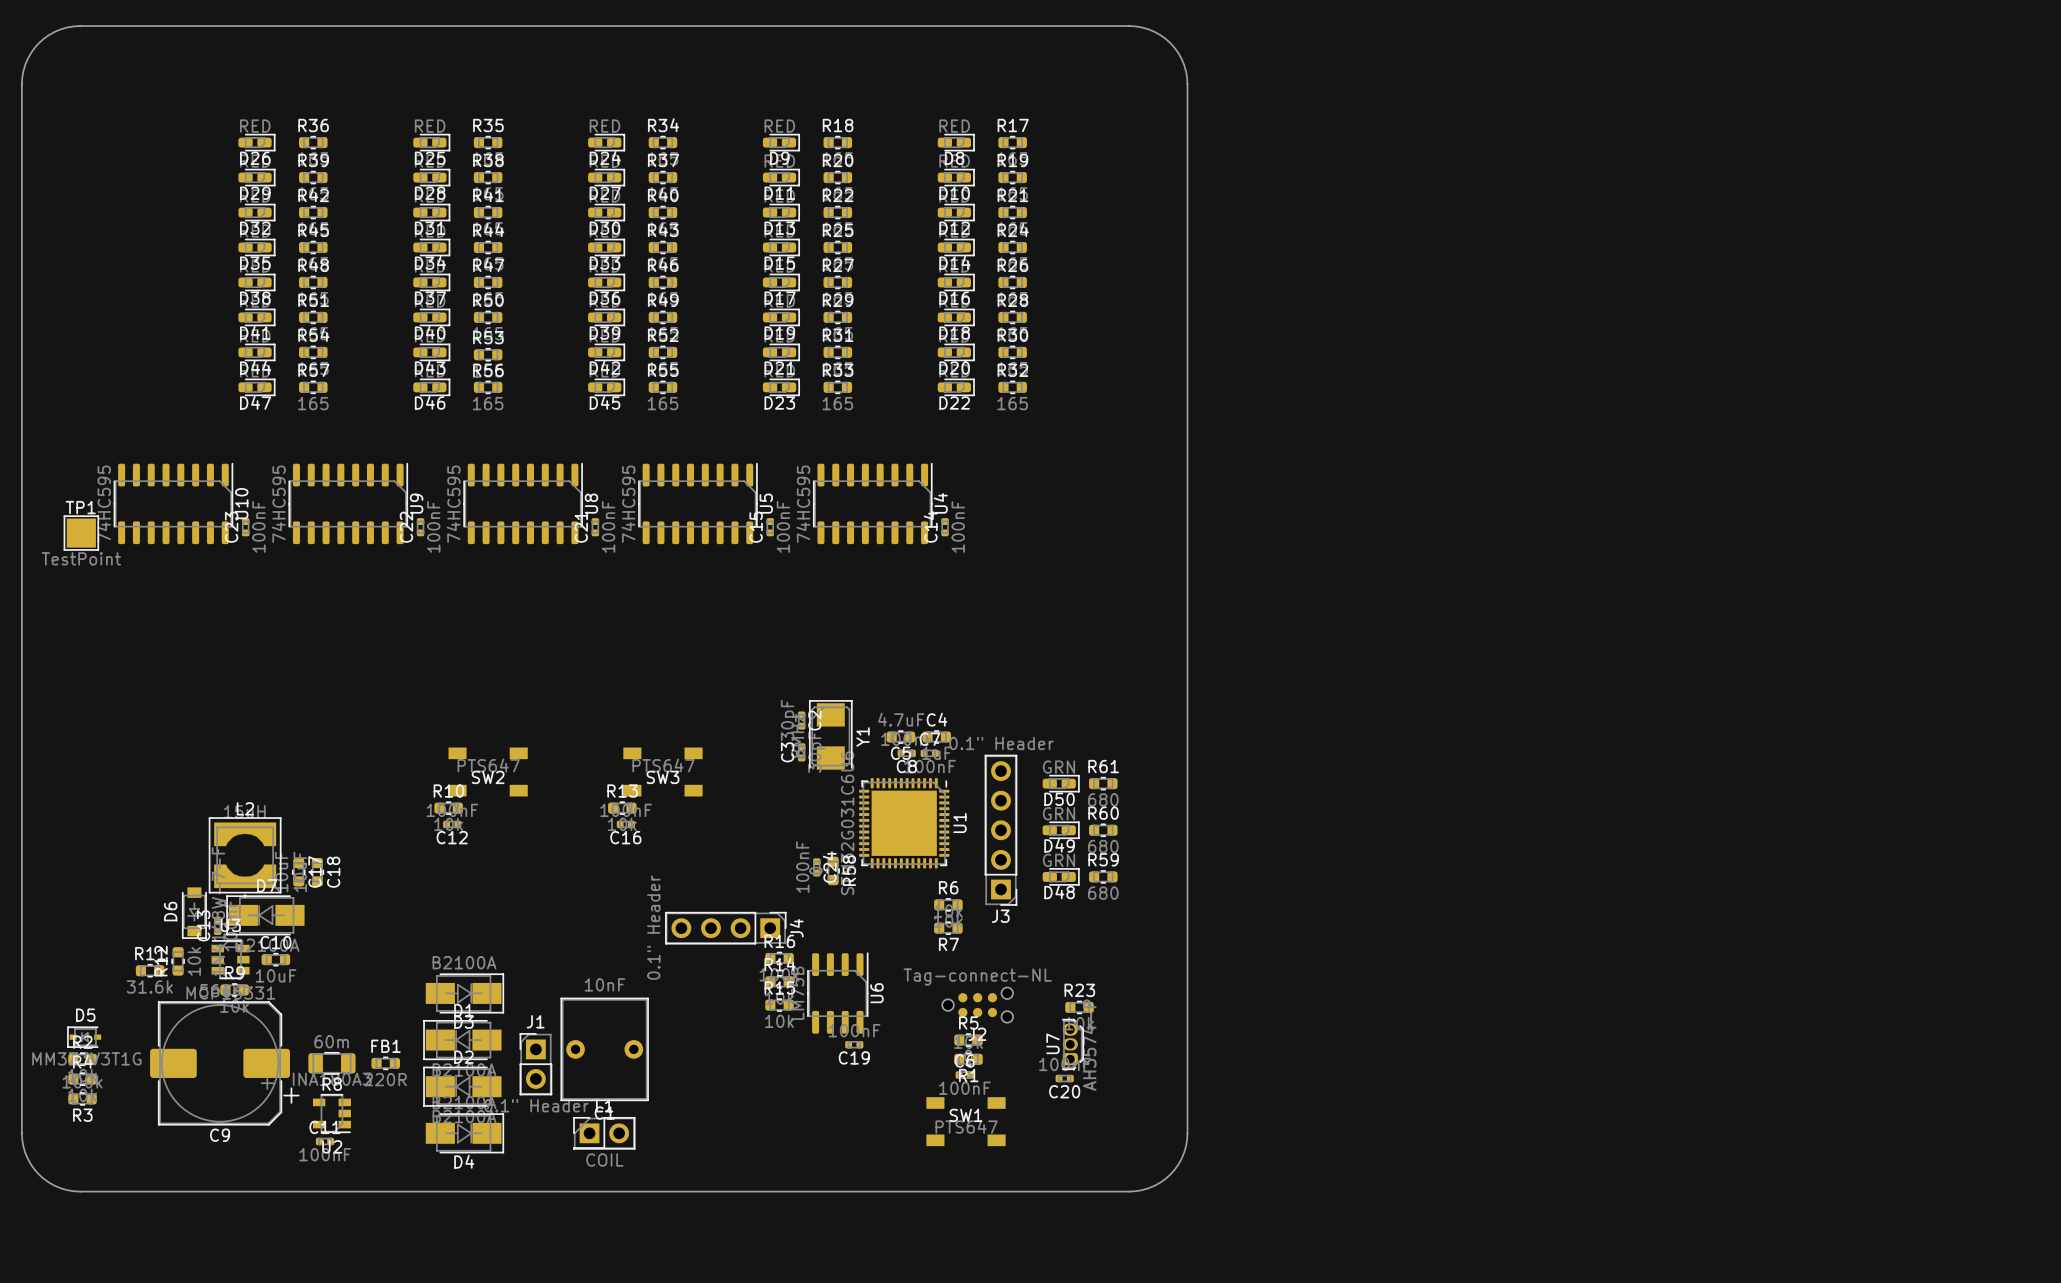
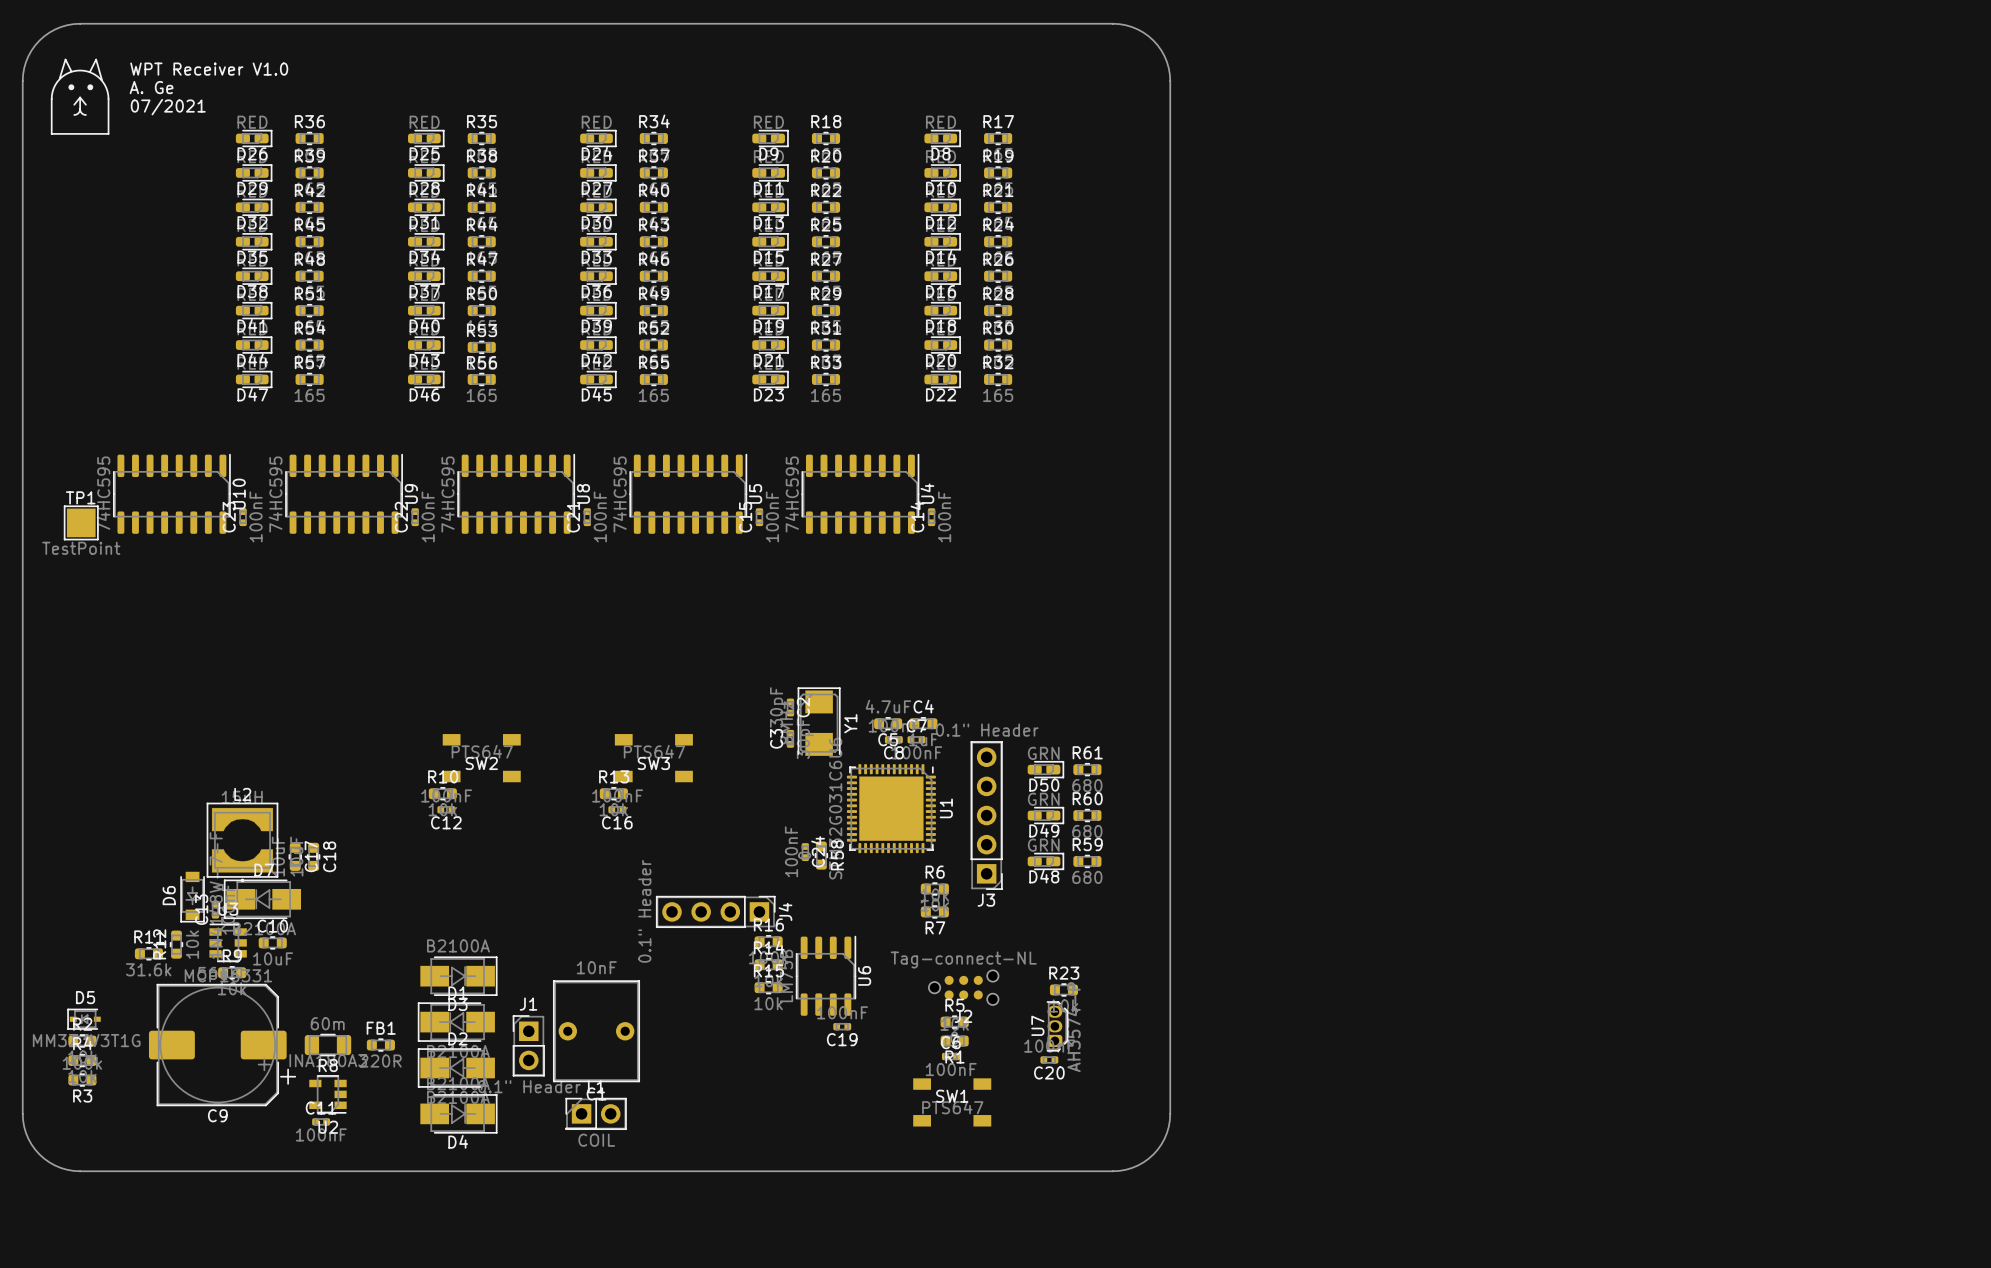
drawing: none -> [50, 58, 110, 135]
text: none -> WPT Receiver V1.0 (209, 69)
text: none -> A. Ge (151, 87)
text: none -> 07/2021 (168, 107)

